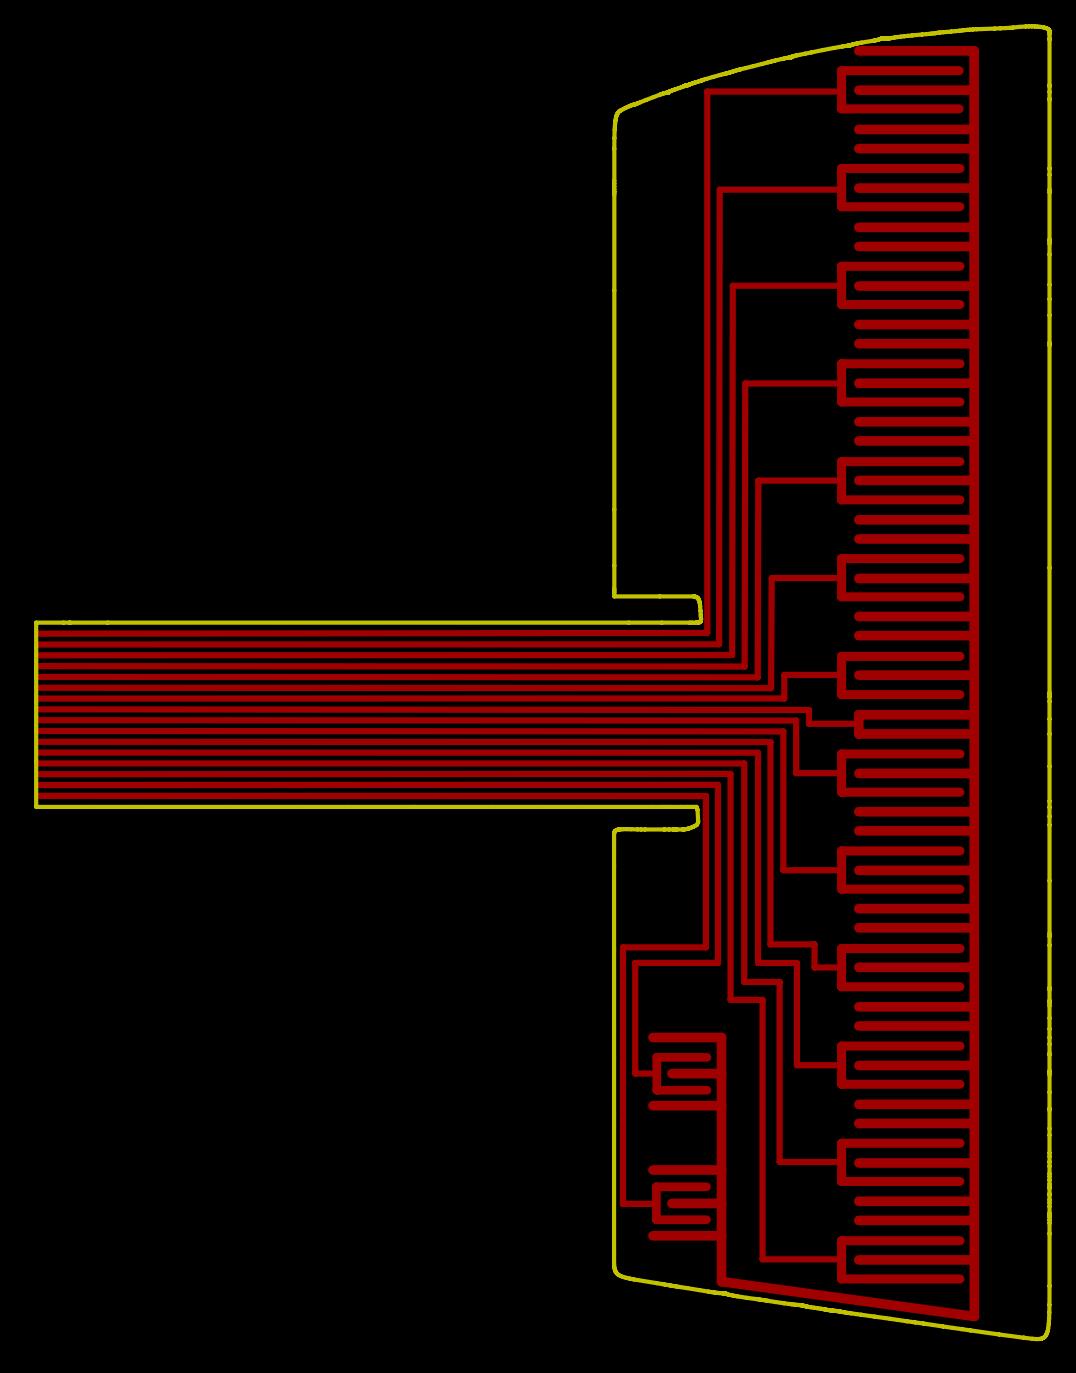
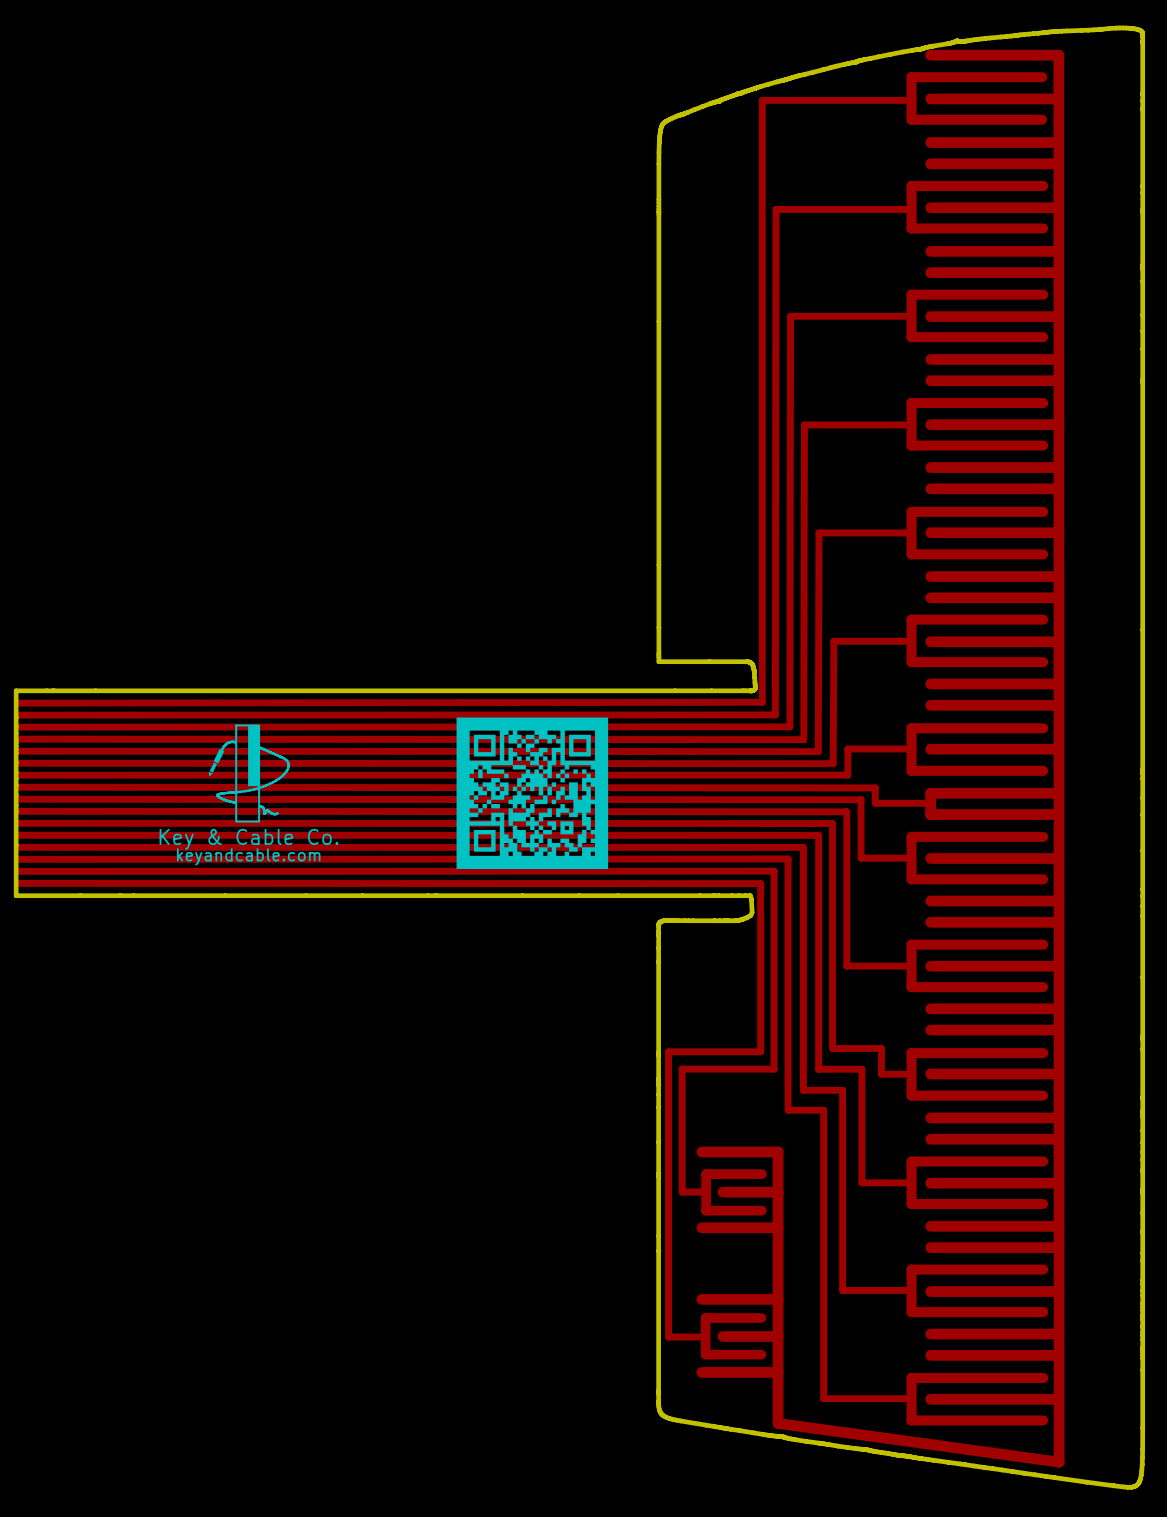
drawing: none -> [456, 717, 609, 870]
drawing: none -> [208, 724, 290, 823]

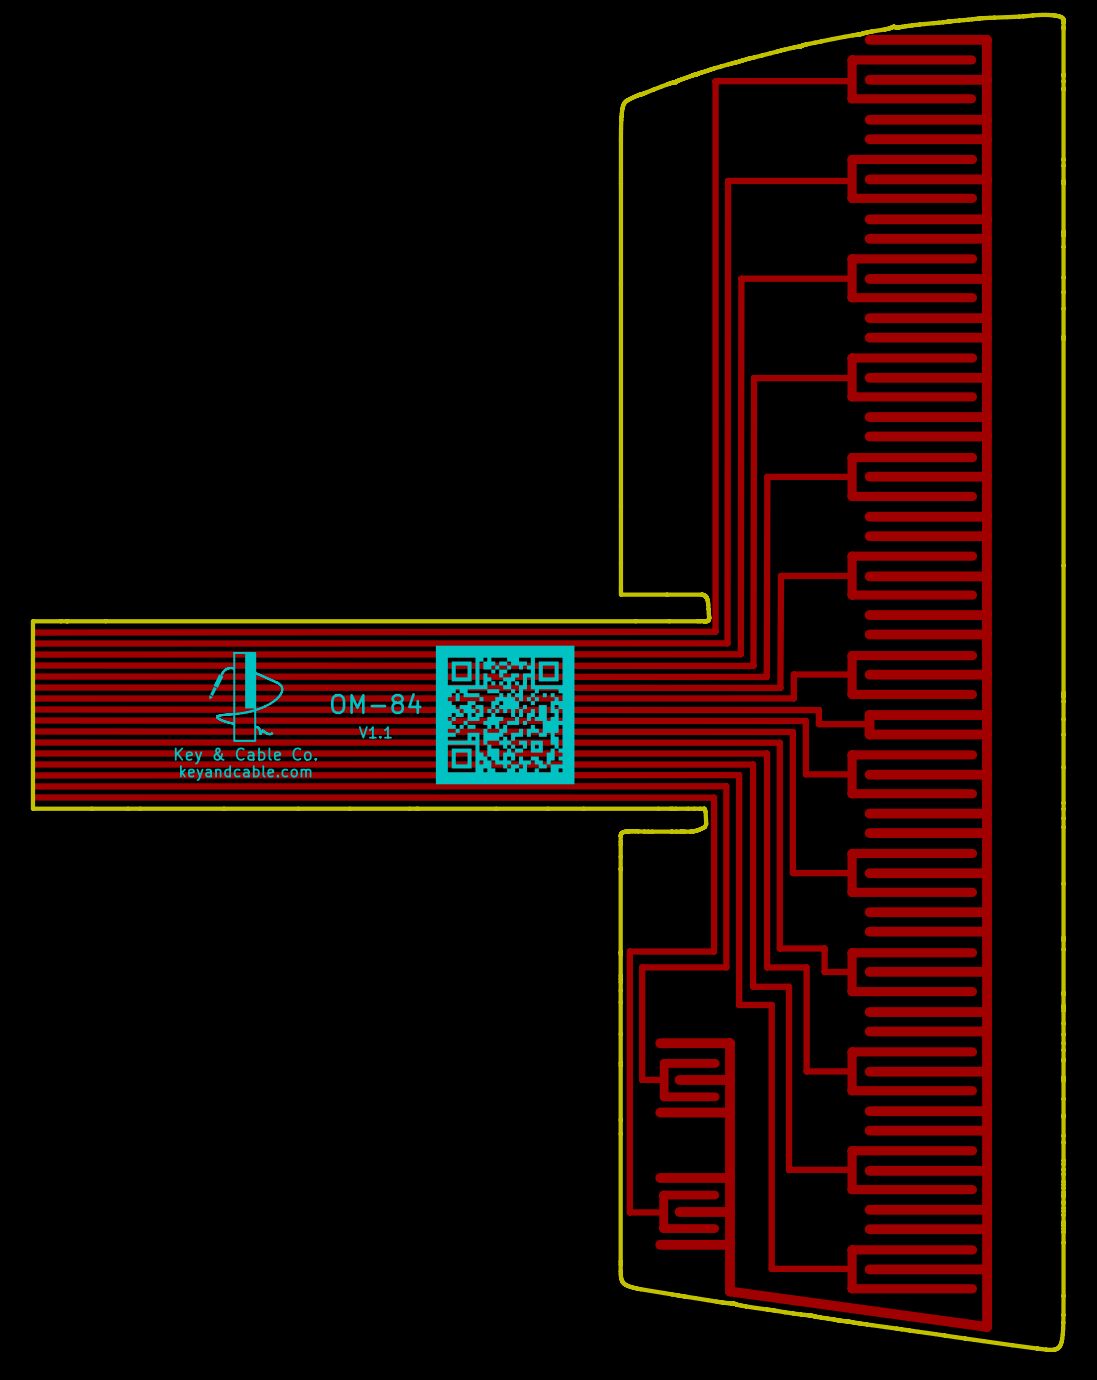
drawing shape: [159, 724, 339, 866] -> [175, 652, 317, 781]
text: none -> OM-84 (376, 703)
text: none -> V1.1 (375, 732)

